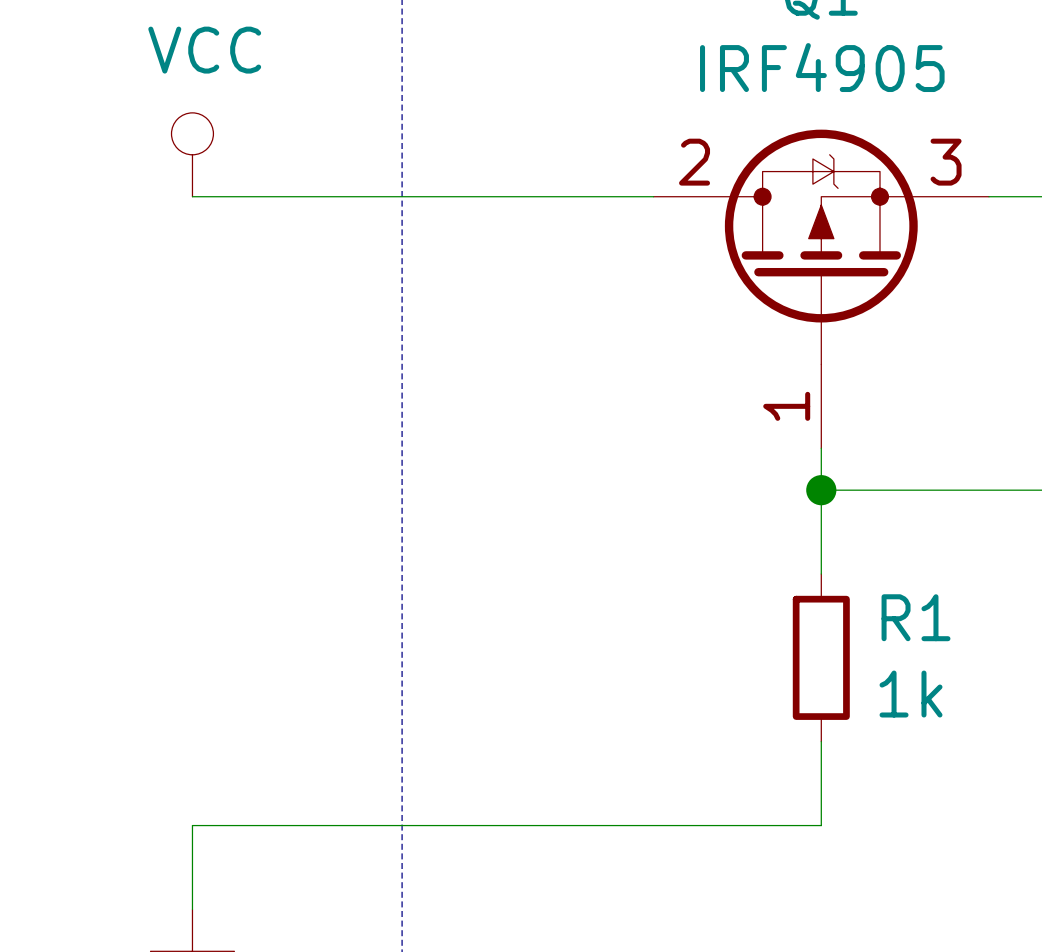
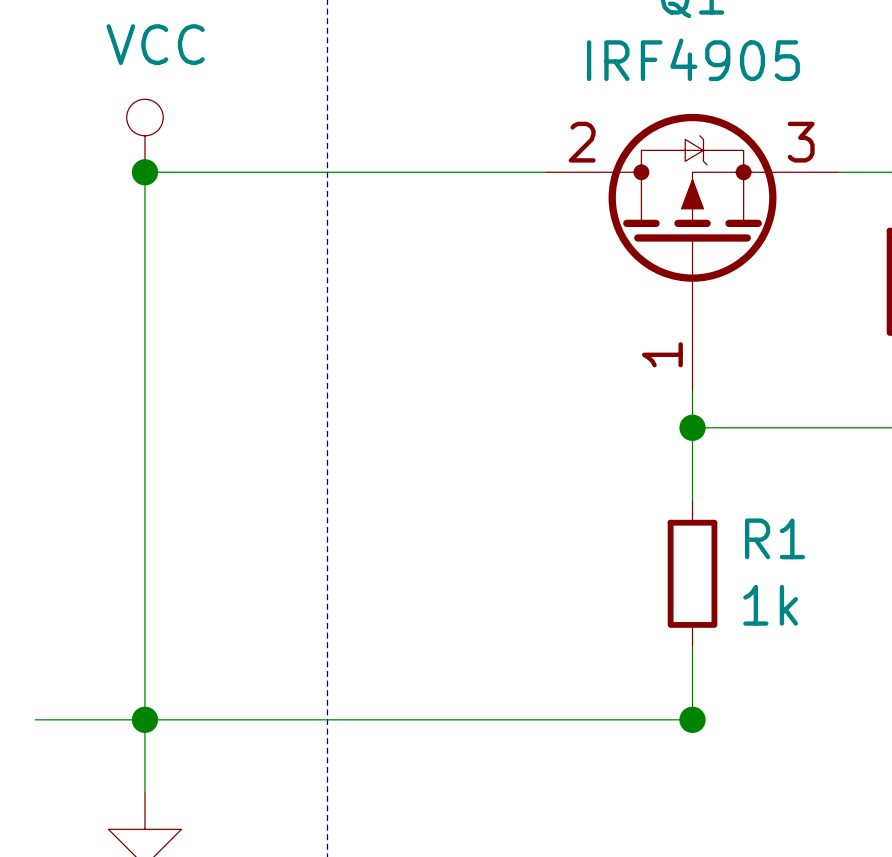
wire: none -> (144, 172) (144, 719) (35, 719)
junction: none -> (144, 172)
junction: none -> (144, 719)
junction: none -> (692, 719)

